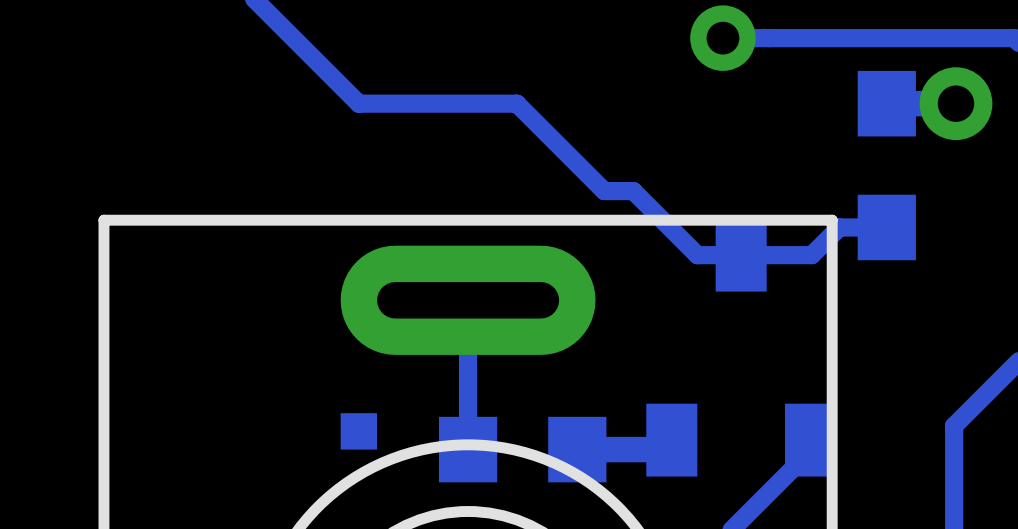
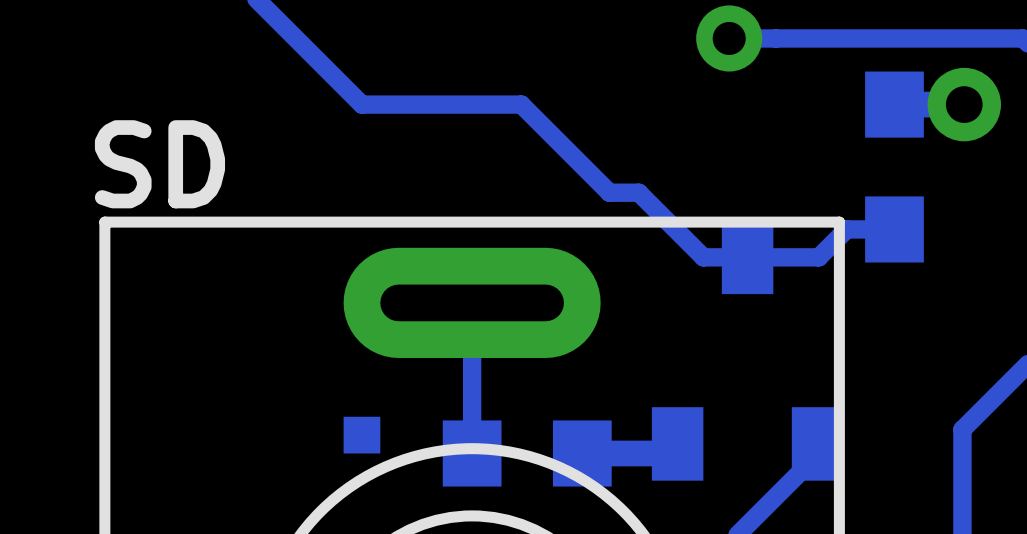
text: none -> SD (159, 164)

